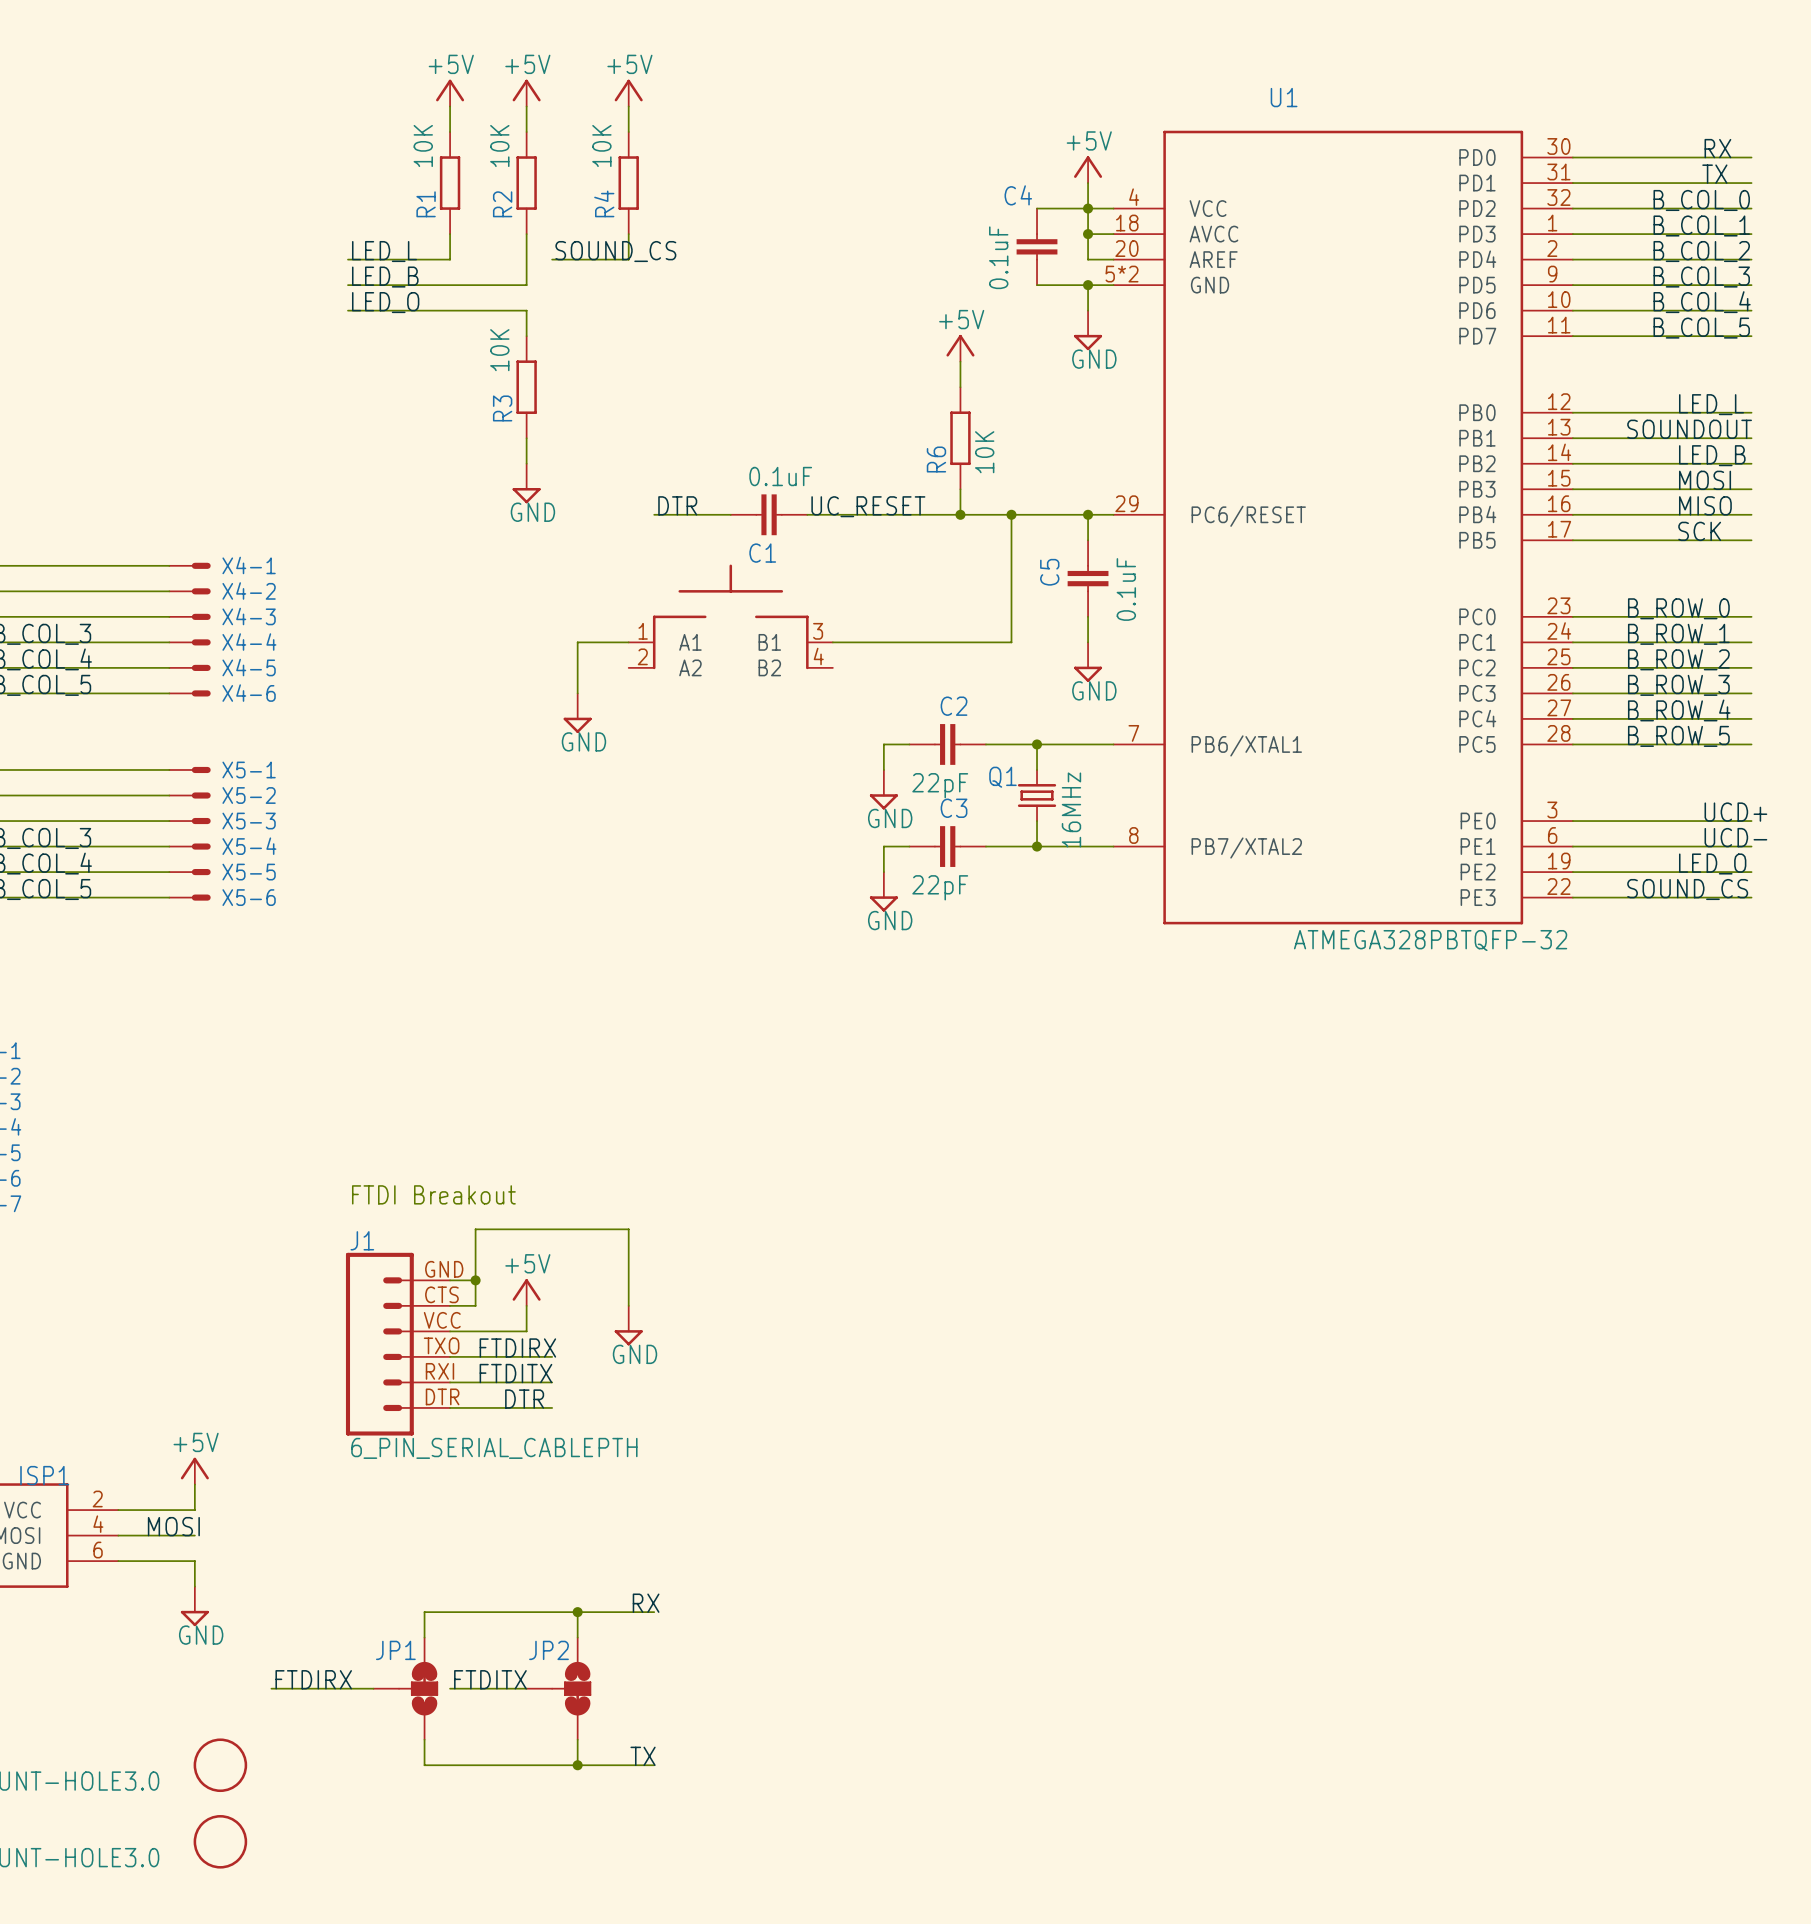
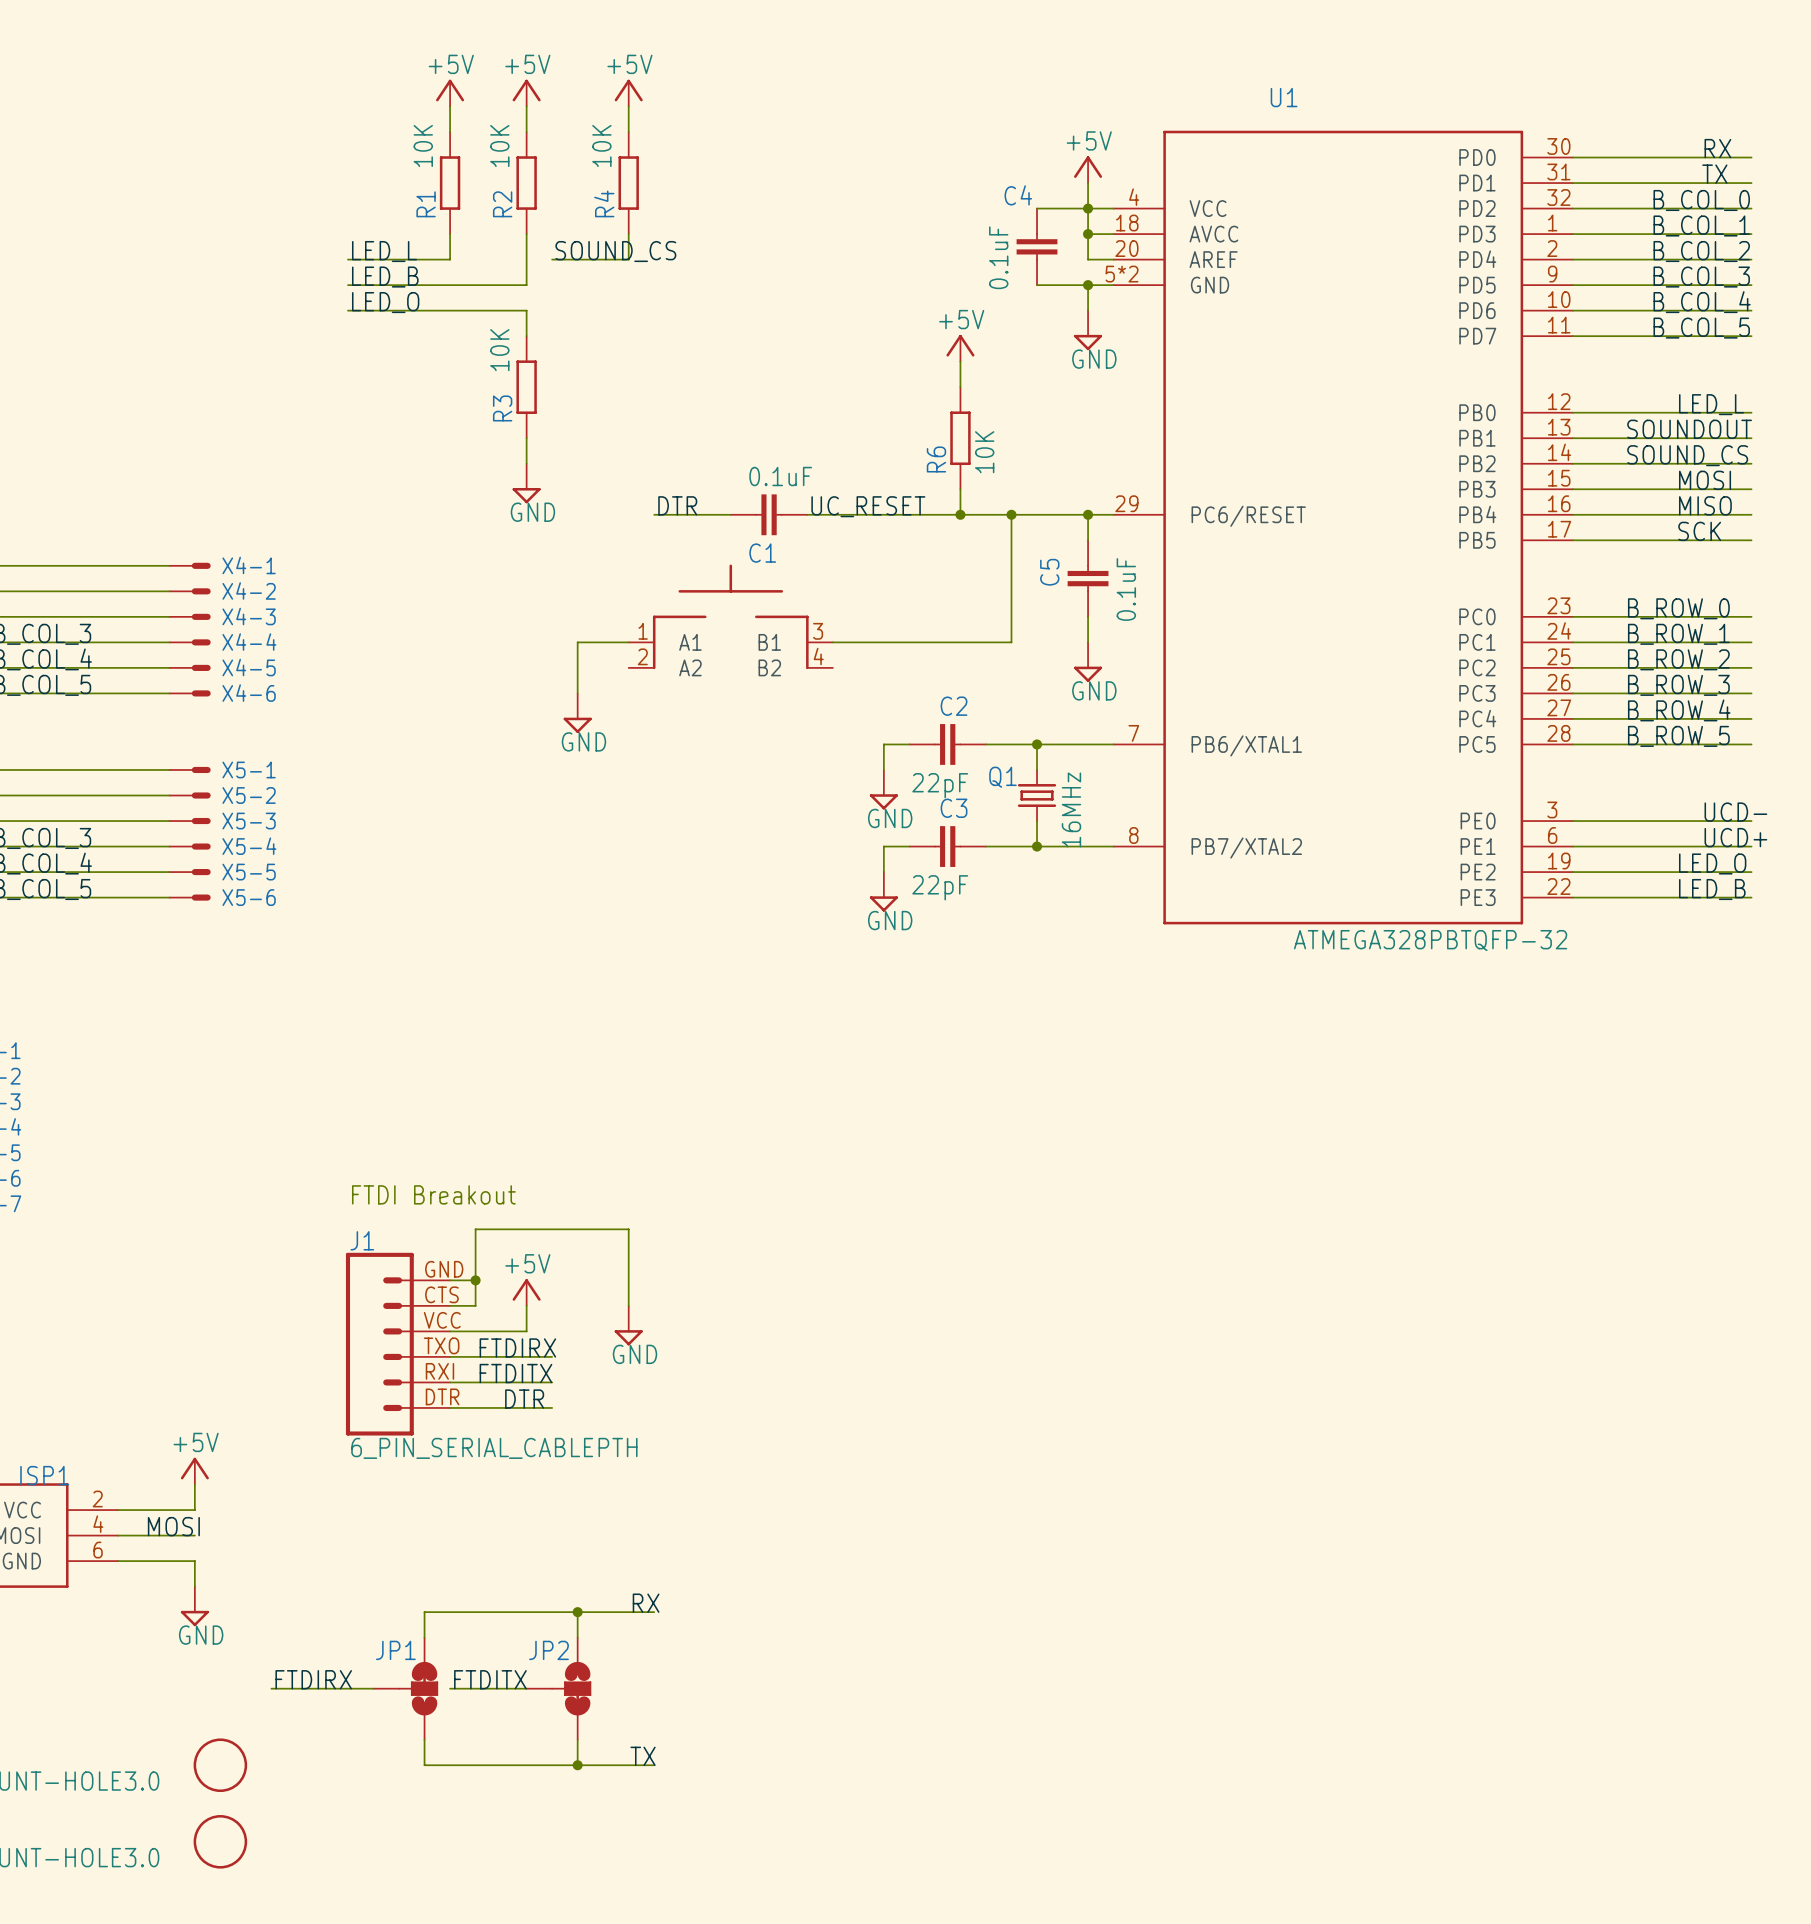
label: none -> SOUND_CS (1687, 455)
label: LED_B (1712, 455) -> none
label: UCD+ (1735, 812) -> UCD- (1735, 812)
label: UCD- (1735, 837) -> UCD+ (1735, 837)
label: SOUND_CS (1687, 889) -> none
label: none -> LED_B (1712, 889)

